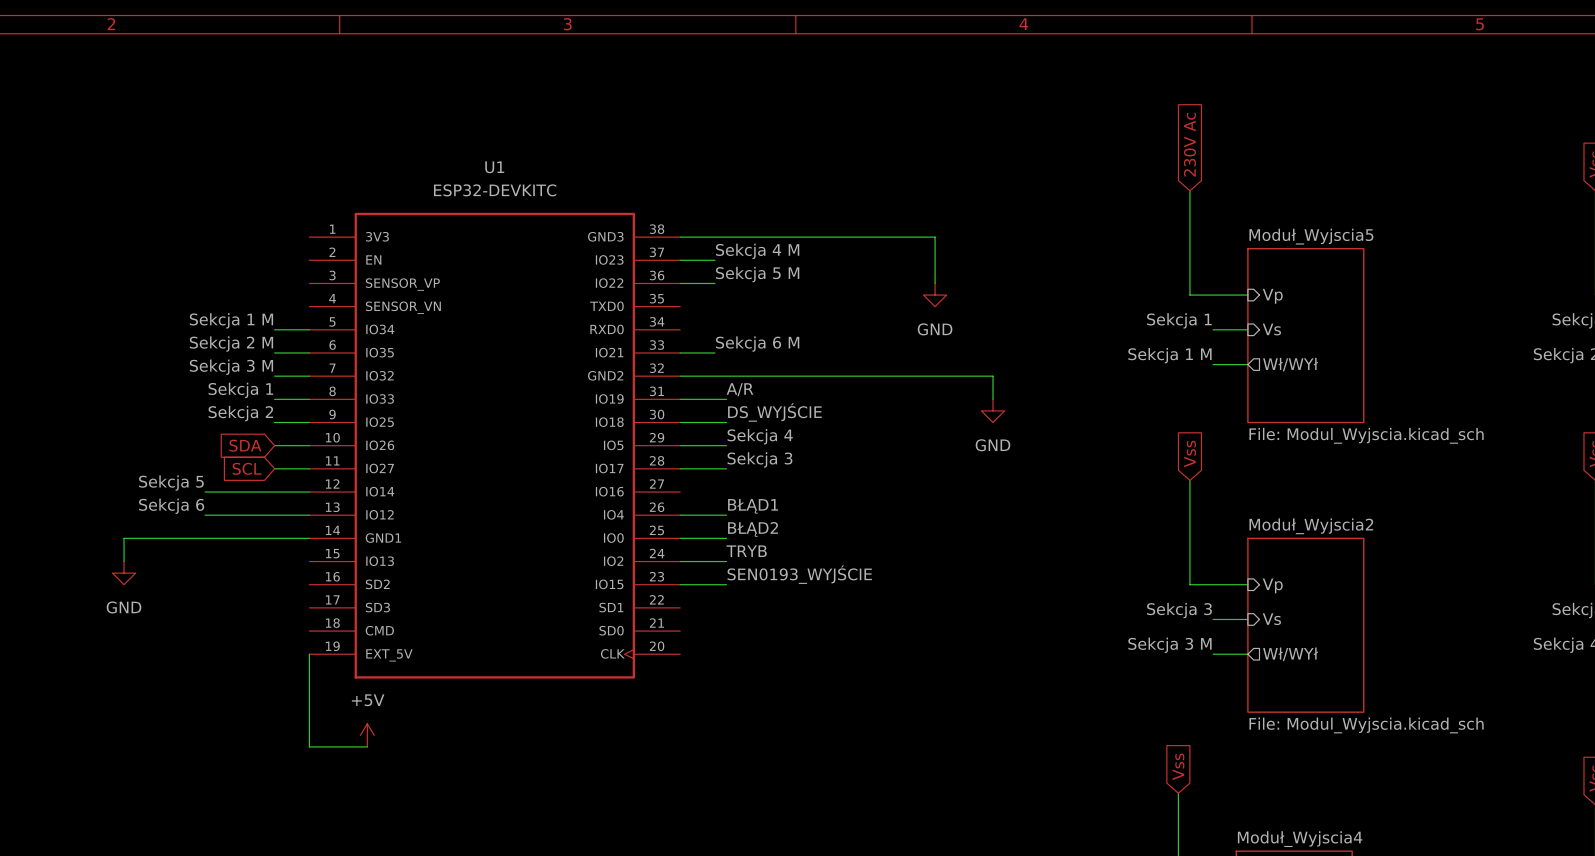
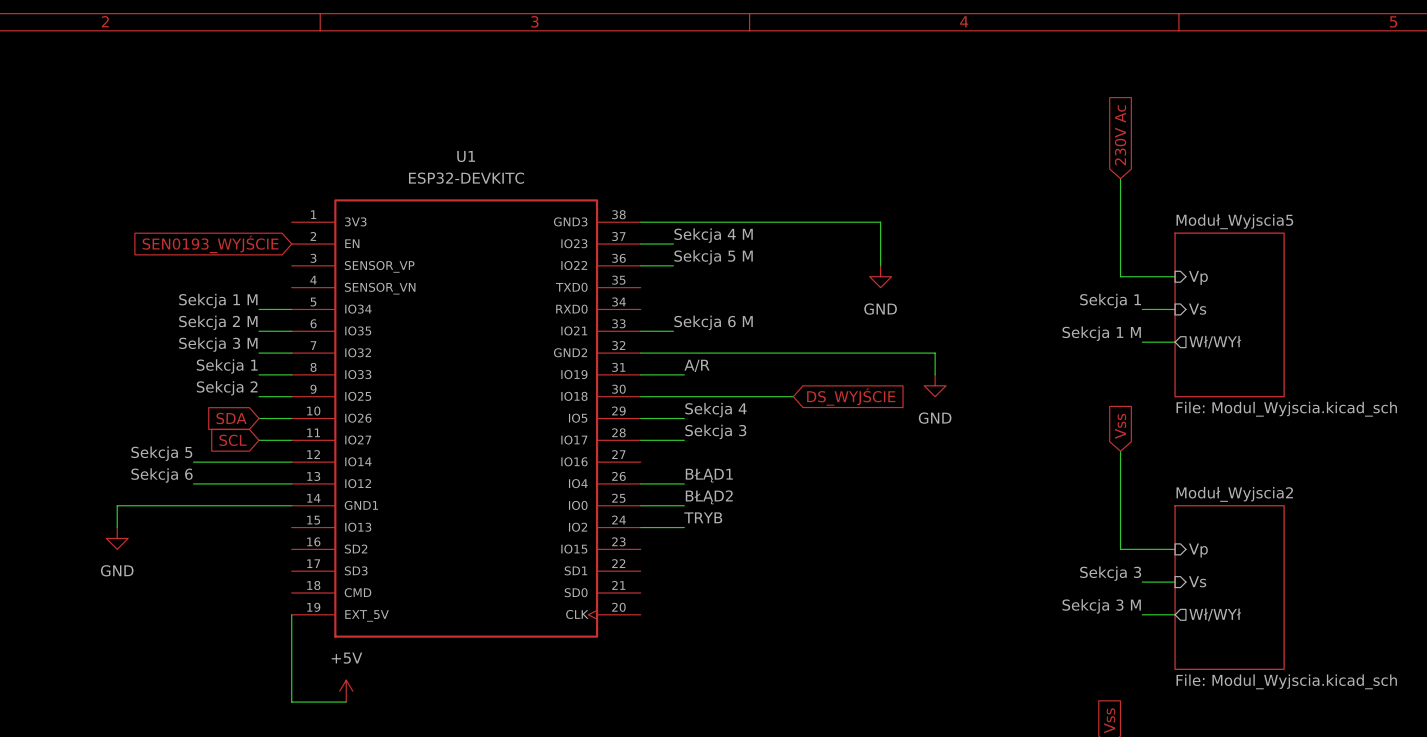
global label: none -> SEN0193_WYJŚCIE (210, 244)
label: DS_WYJŚCIE (774, 412) -> none
wire: none -> (684, 396) (793, 396)
global label: none -> DS_WYJŚCIE (851, 397)
label: SEN0193_WYJŚCIE (799, 574) -> none
wire: (680, 584) (726, 584) -> none

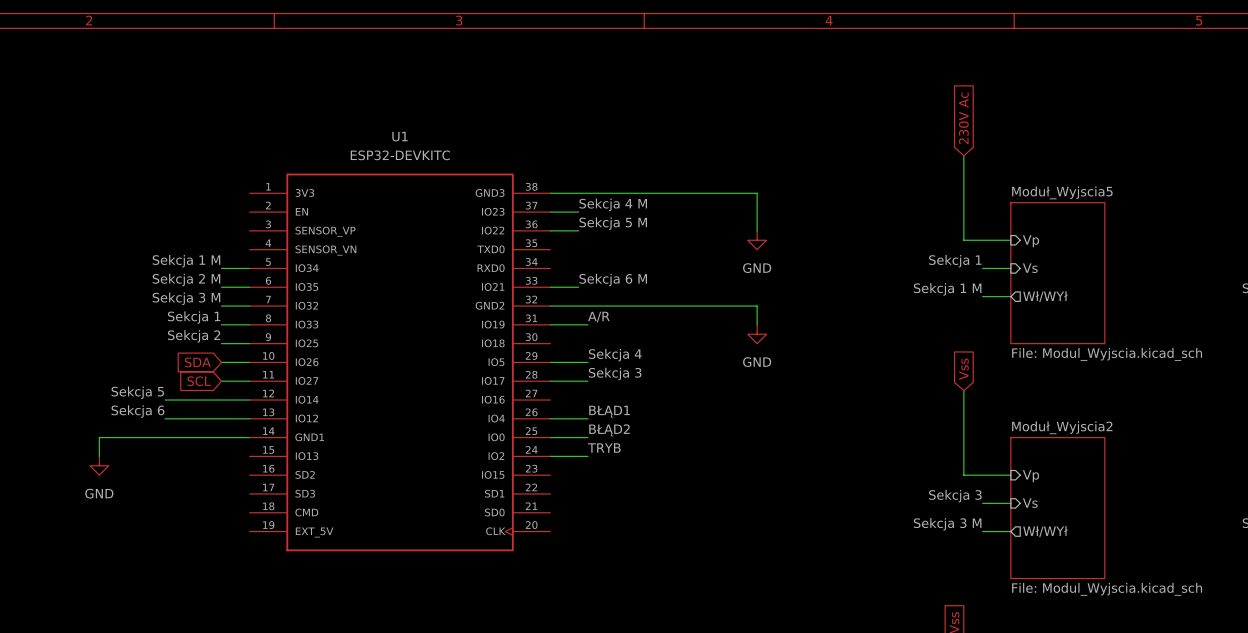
global label: SEN0193_WYJŚCIE (210, 244) -> none
wire: (880, 353) (935, 353) (935, 374) -> (757, 306) (757, 324)
power symbol position: GND (935, 385) -> GND (757, 334)
wire: (640, 396) (793, 396) -> none
global label: DS_WYJŚCIE (851, 397) -> none
wire: (291, 614) (291, 702) (346, 702) -> none
power symbol: +5V (346, 691) -> none

